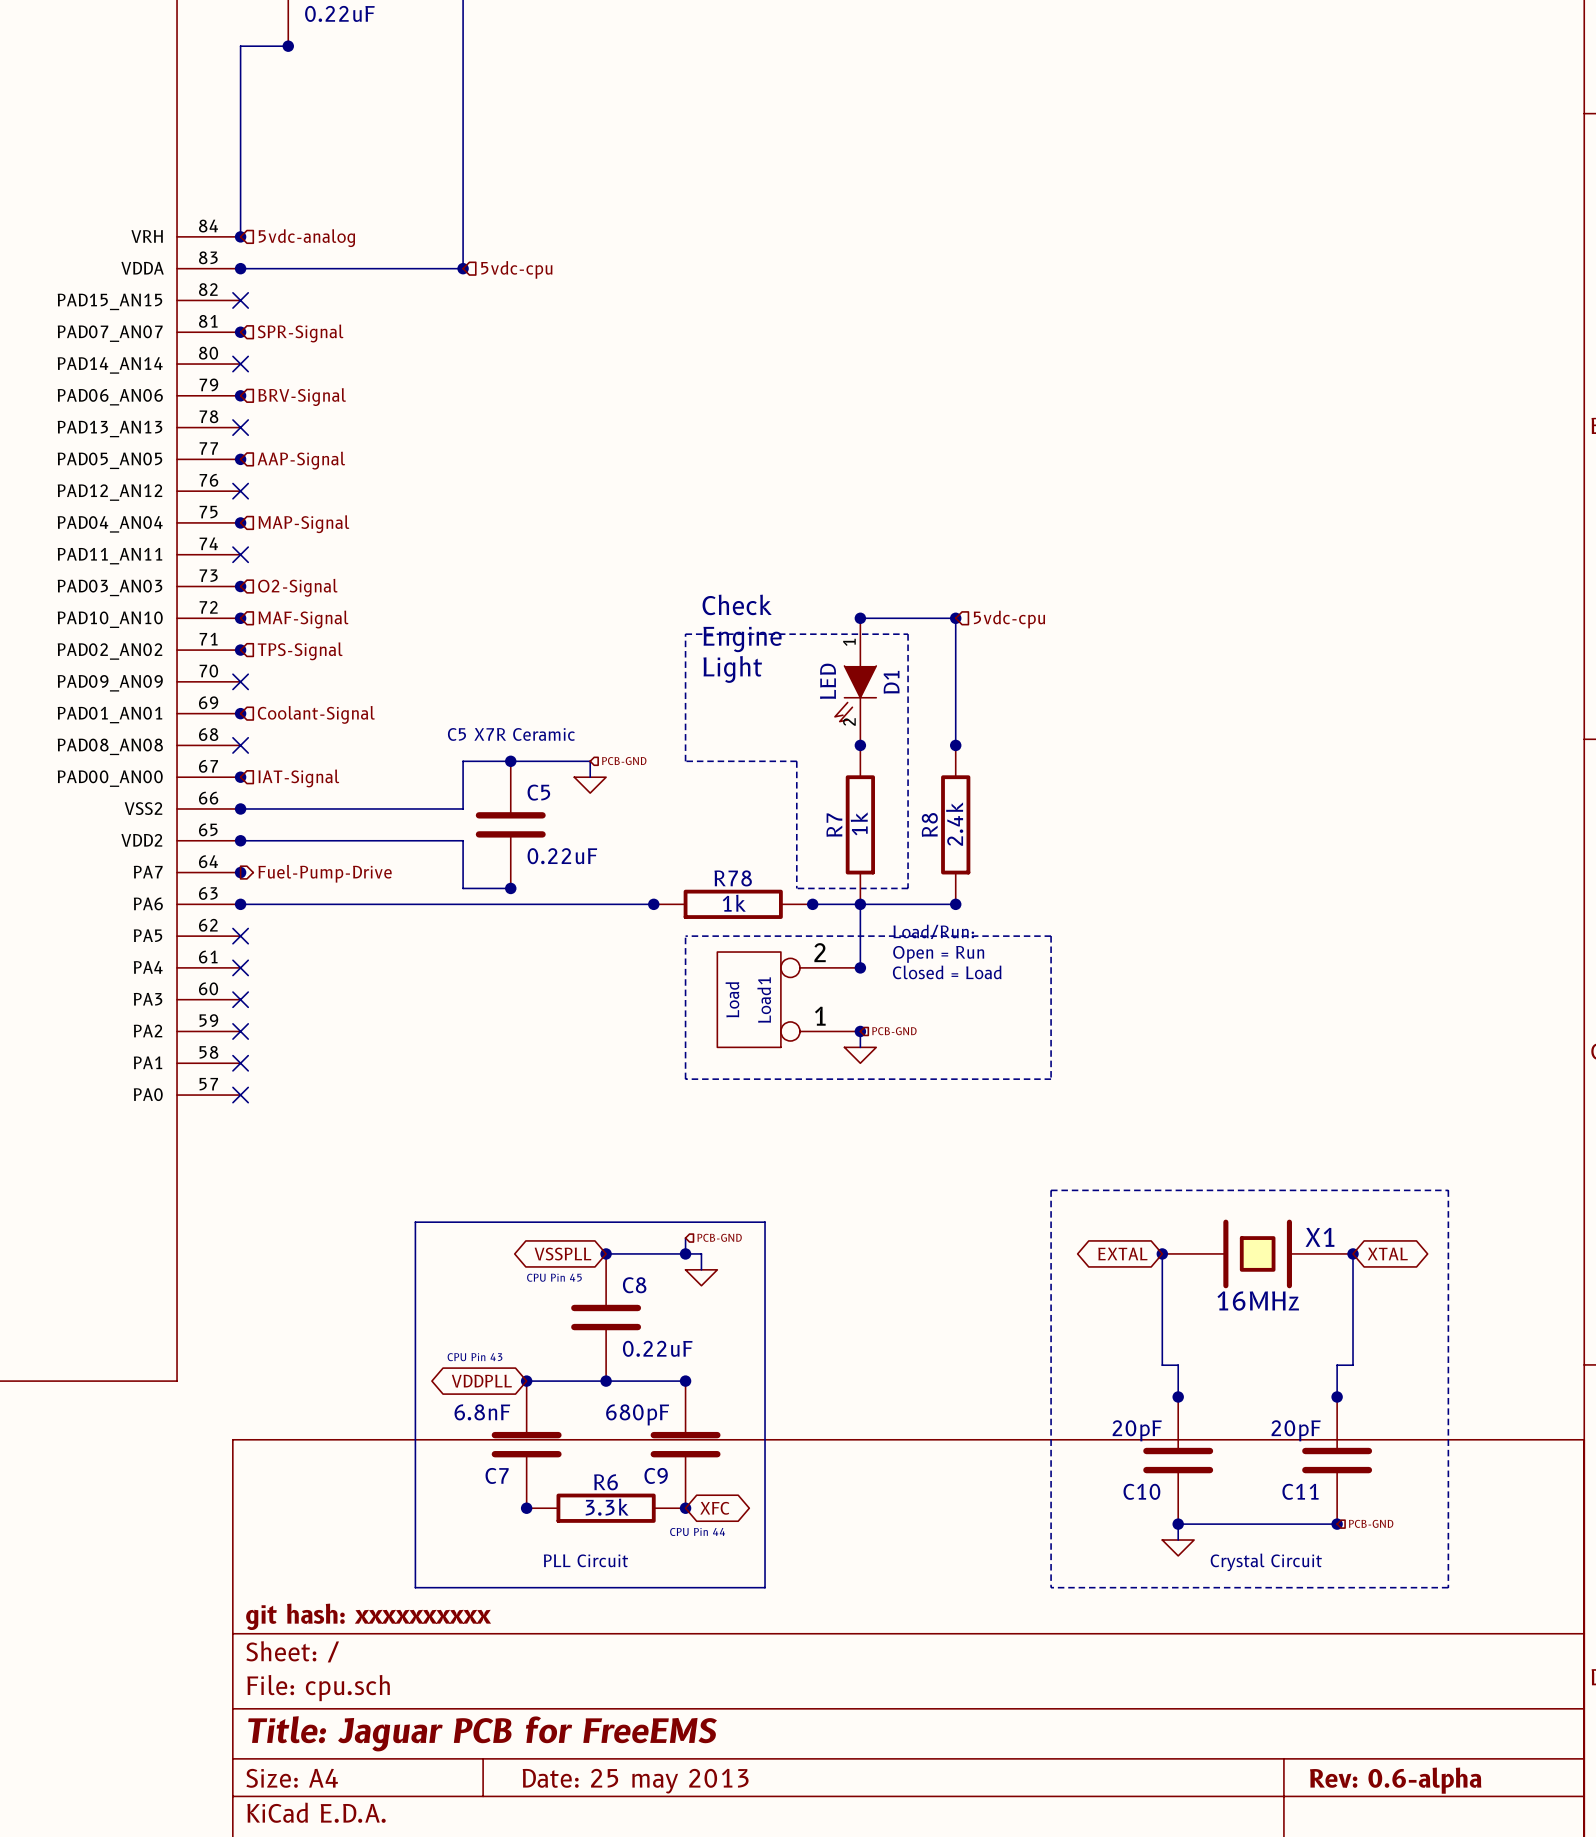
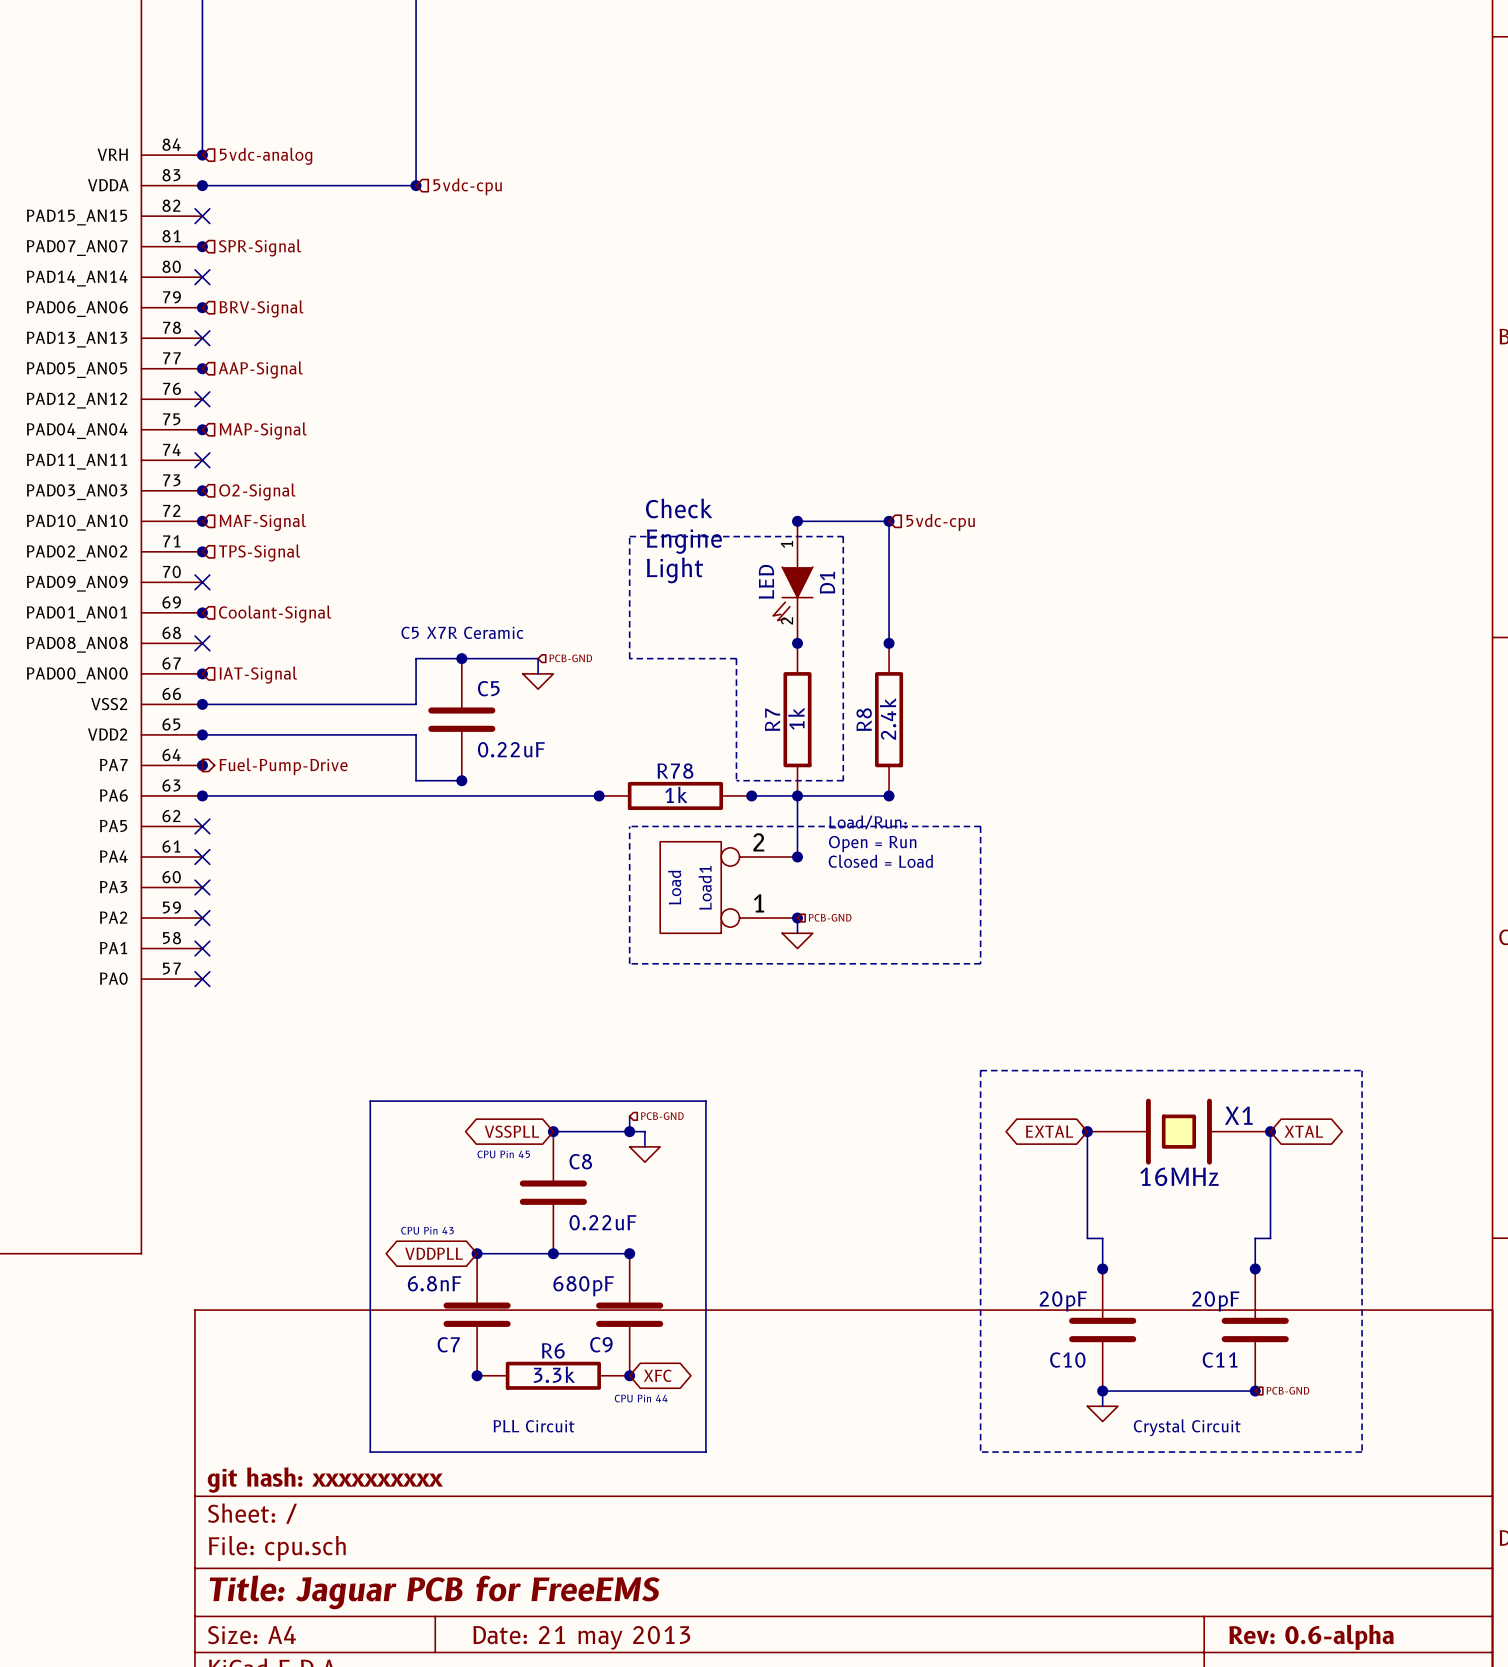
title block: Date: 25 may 2013 (635, 1781) -> Date: 21 may 2013 (581, 1637)

